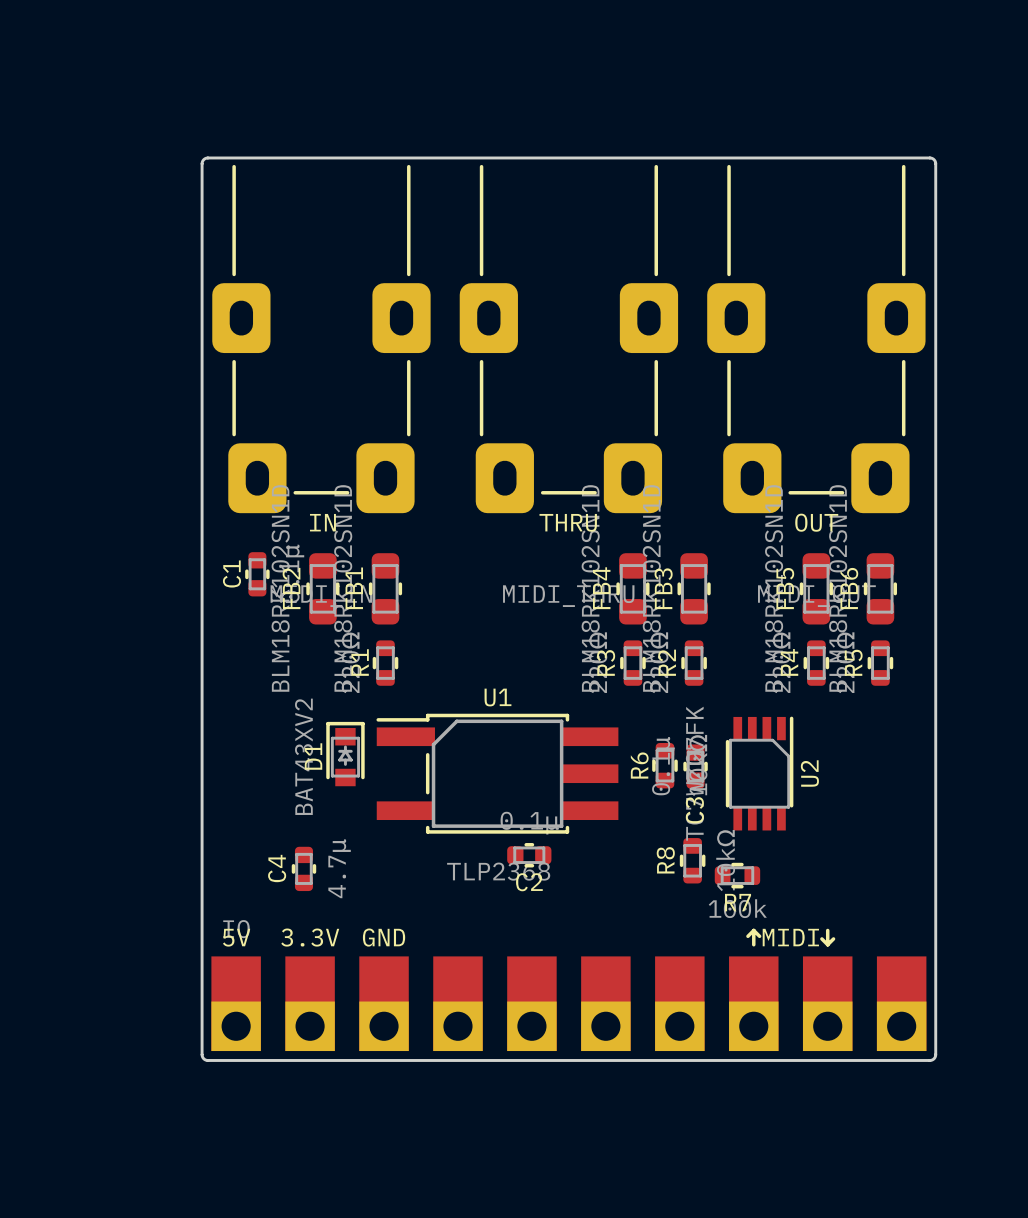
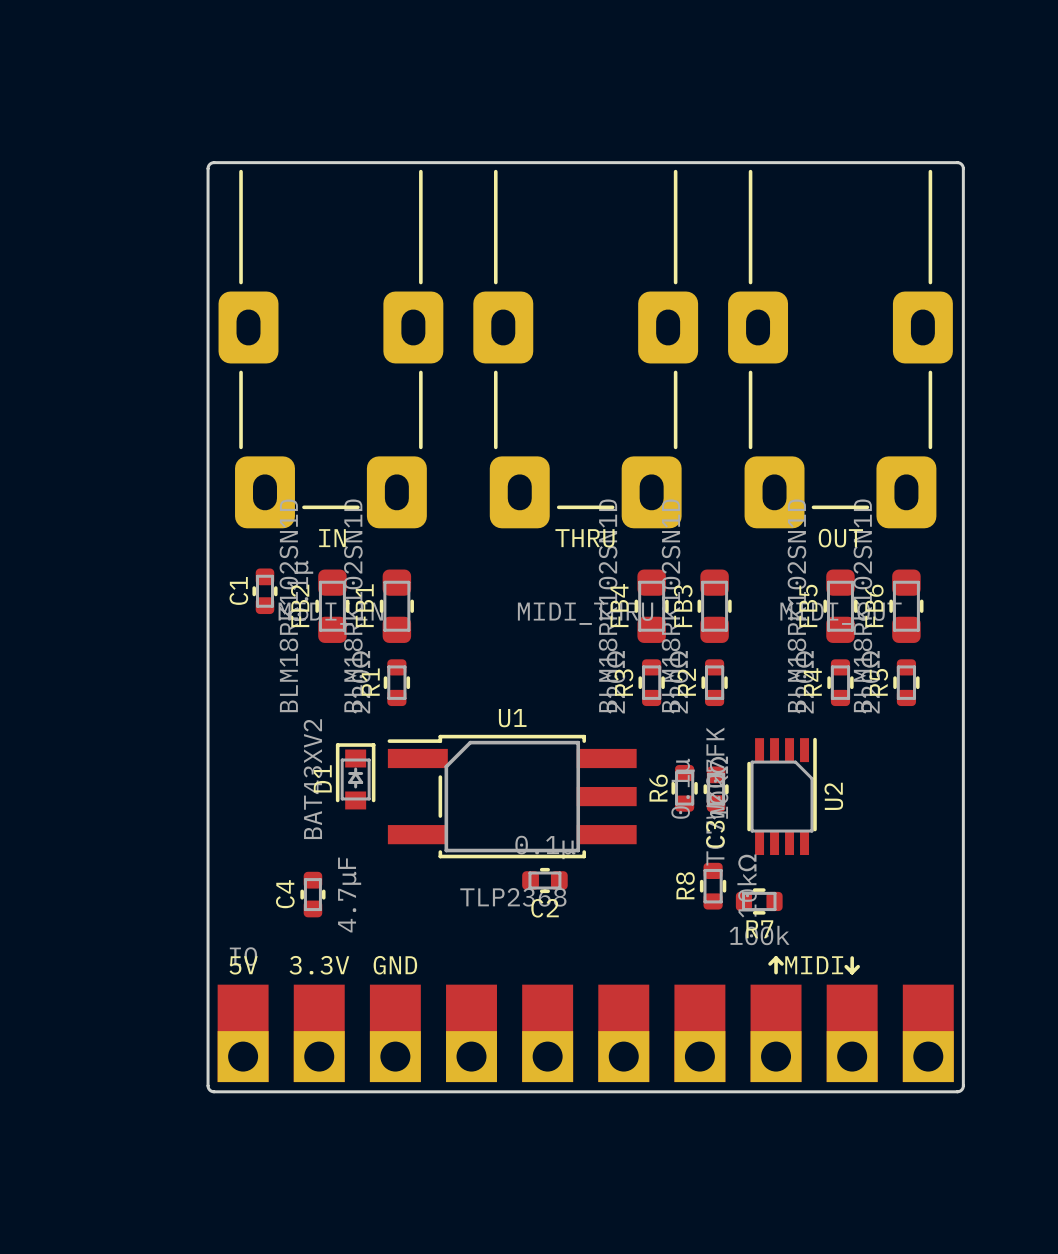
C4 value: 4.7μ (339, 868) -> 4.7μF (349, 895)

